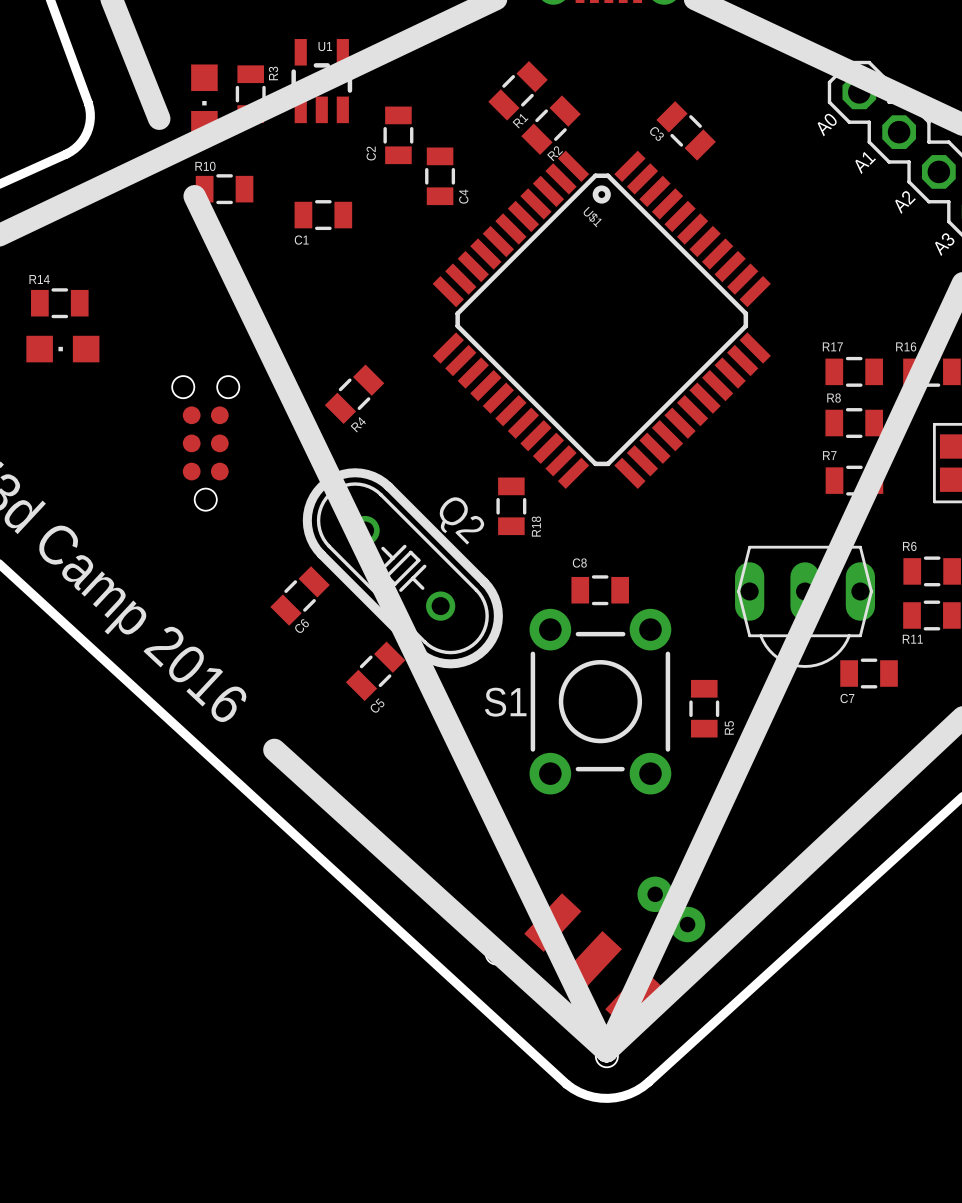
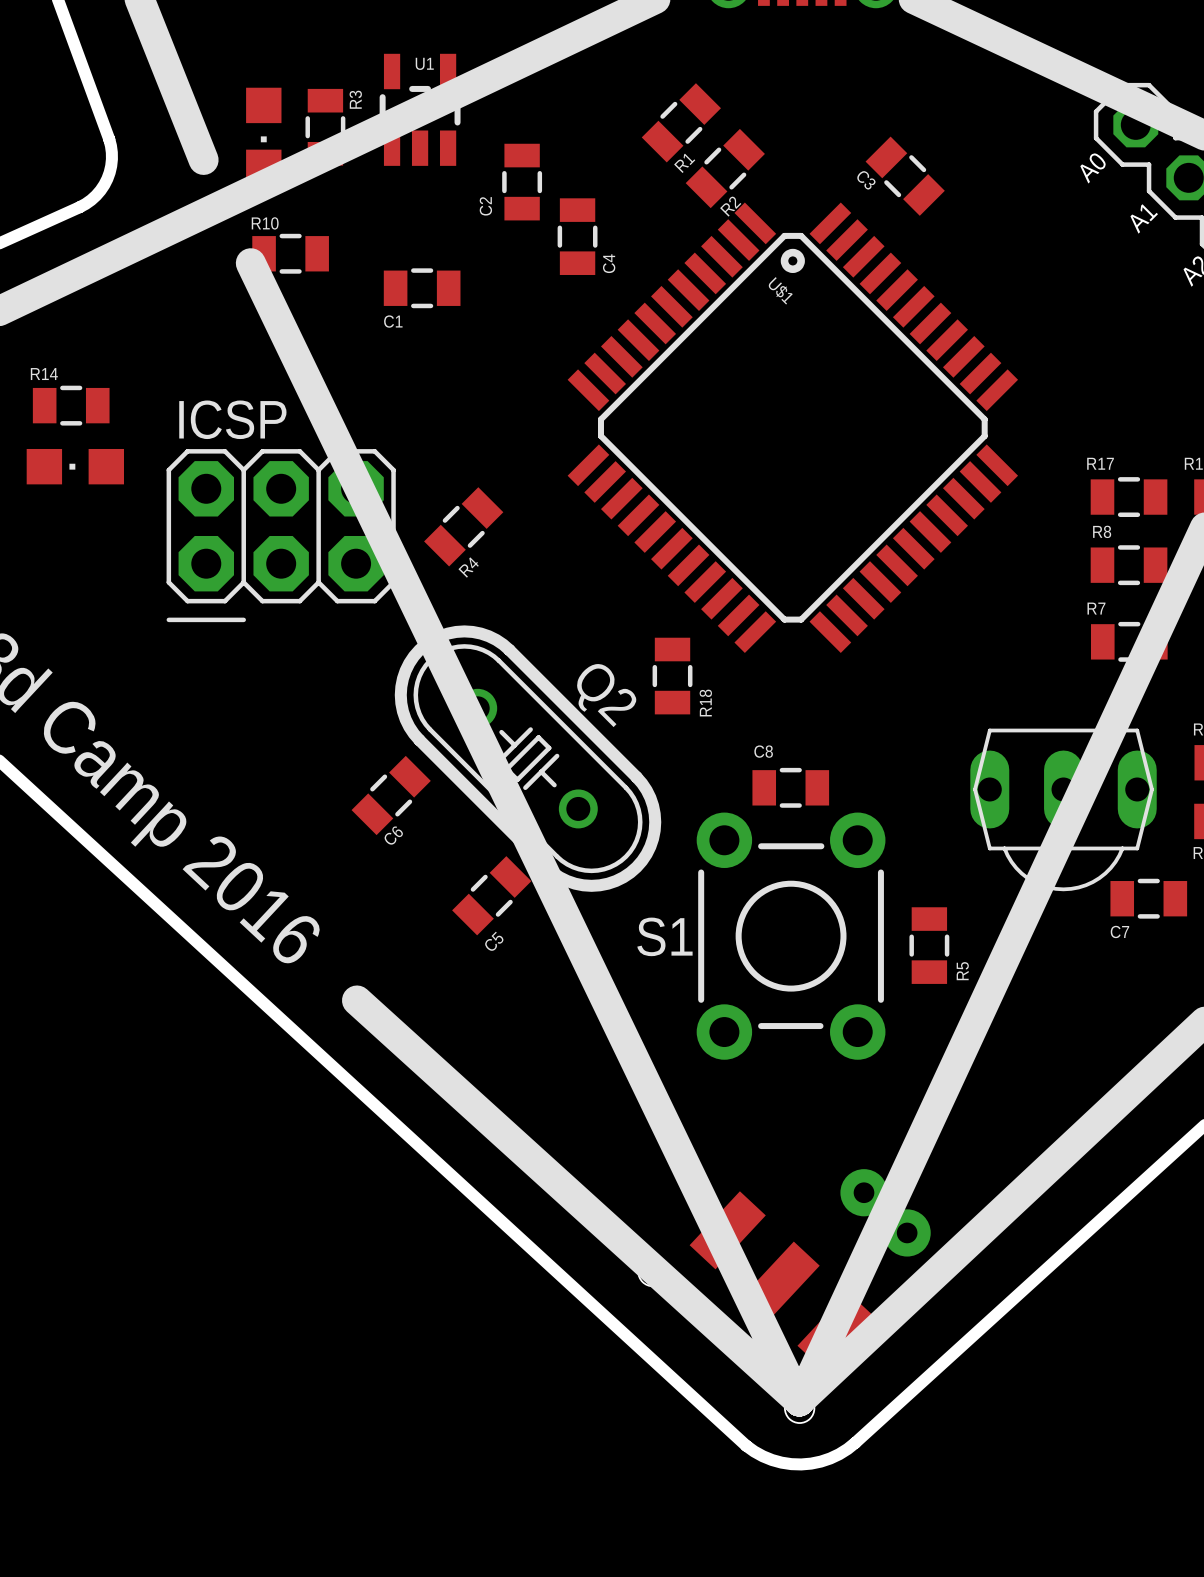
ICSP: none -> (281, 535)
part: (205, 443) -> none

